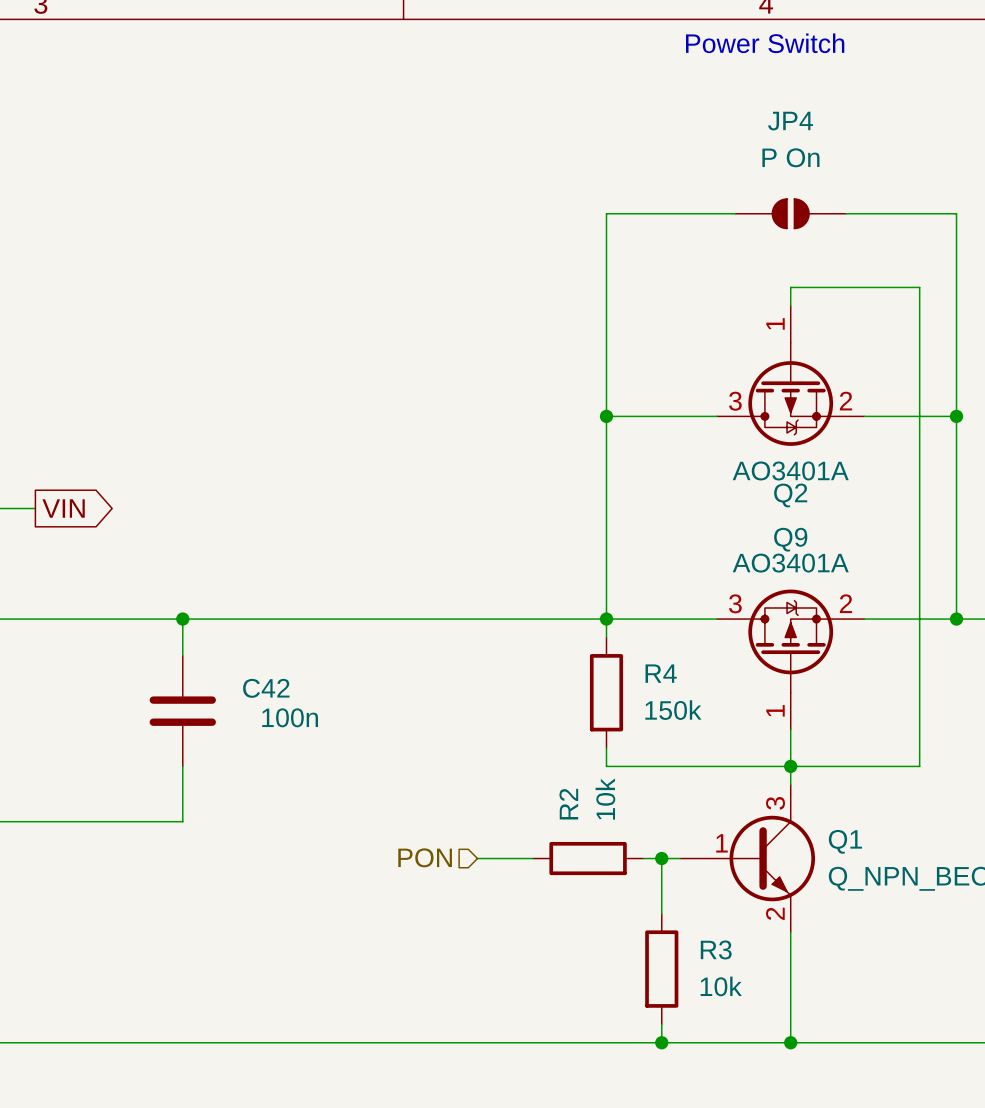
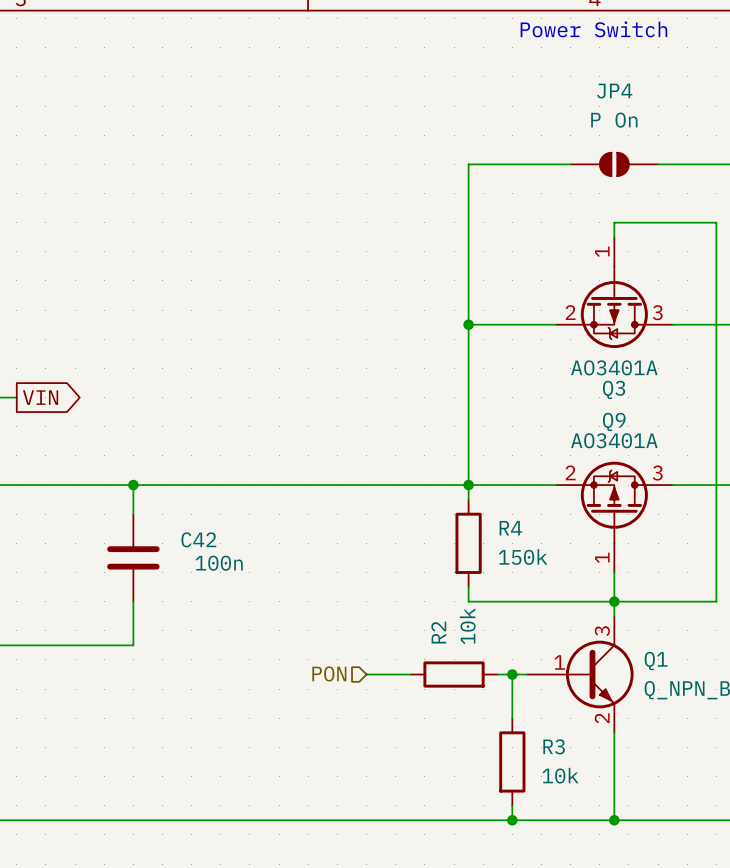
Q2: AO3401A (790, 375) -> none
Q3: none -> AO3401A (614, 292)
Q9 flip: as is (790, 641) -> left-right (614, 502)

